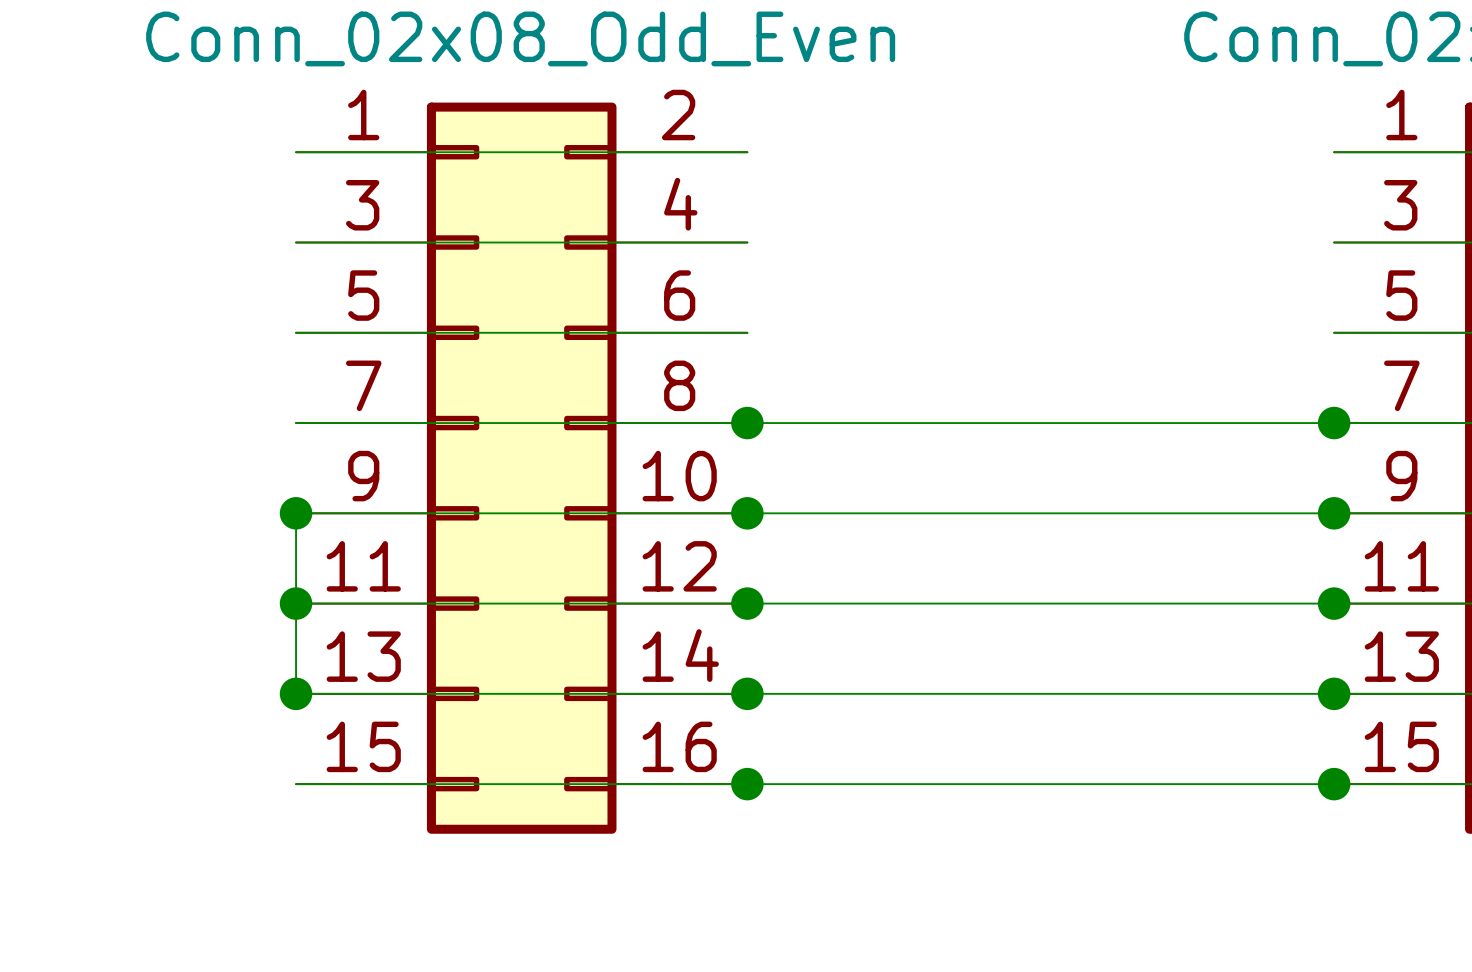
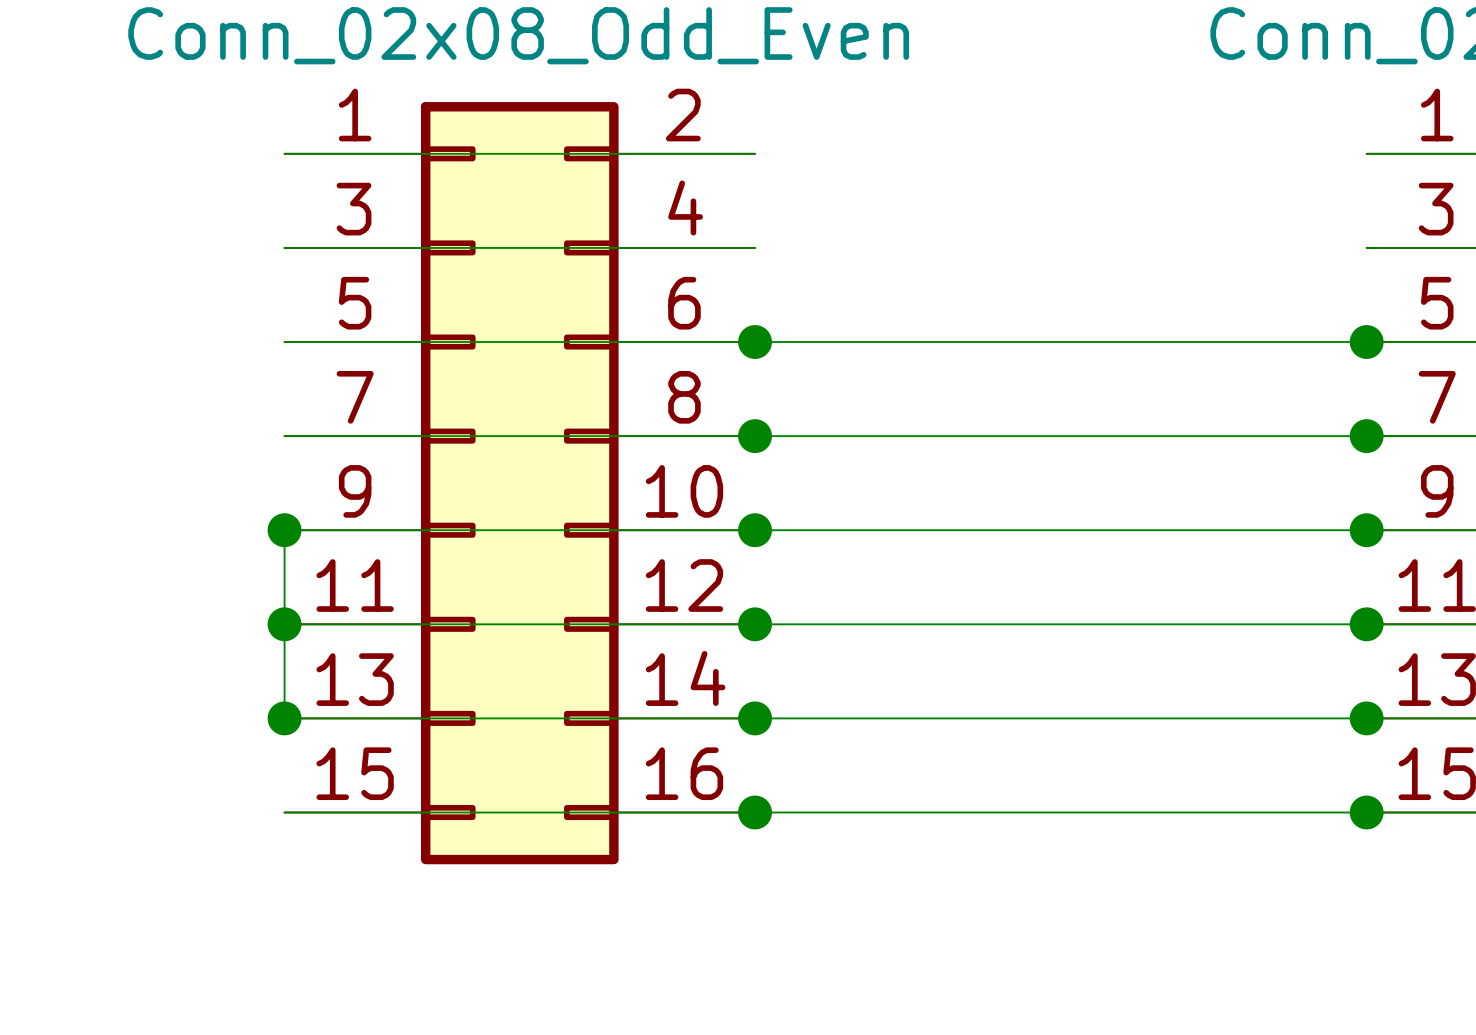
wire: none -> (755, 342) (1366, 342)
junction: none -> (755, 342)
junction: none -> (1366, 342)

